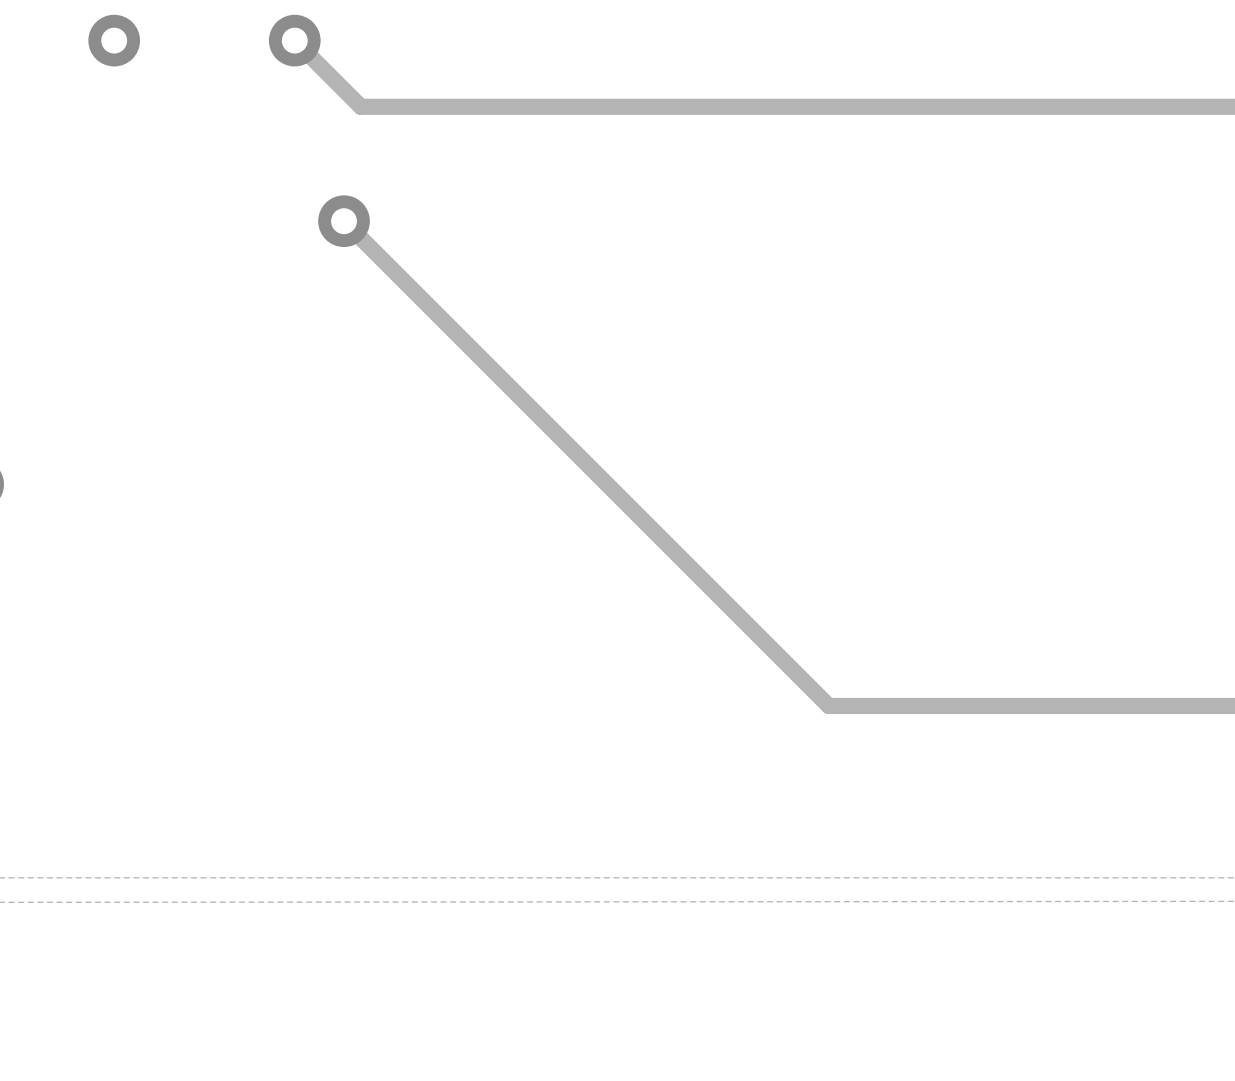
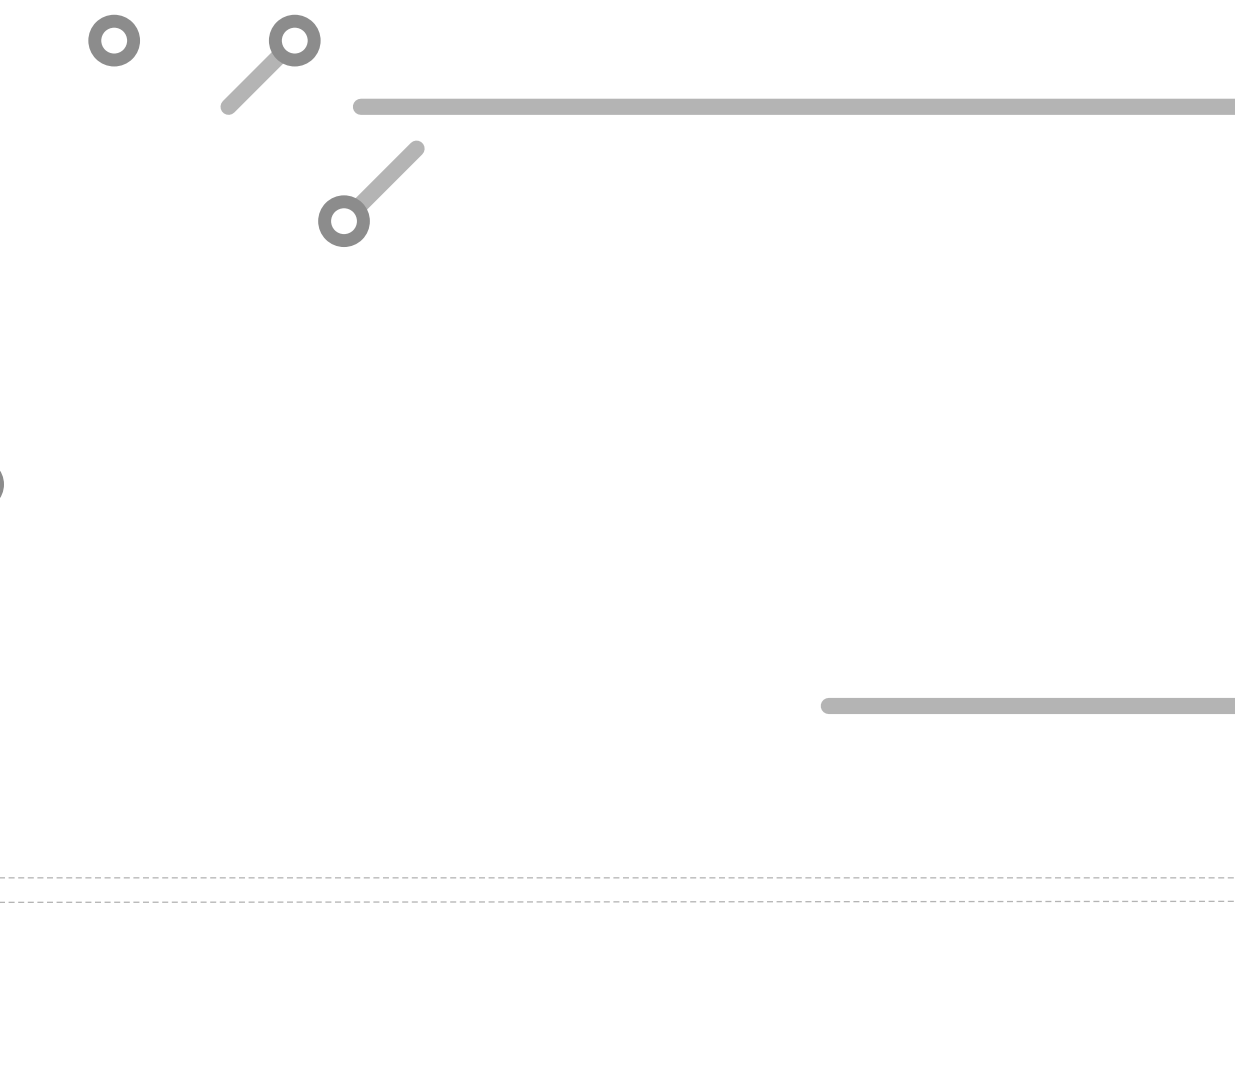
track: (294, 40) (360, 106) -> (294, 40) (228, 106)
track: (344, 221) (828, 705) -> (344, 221) (416, 148)

